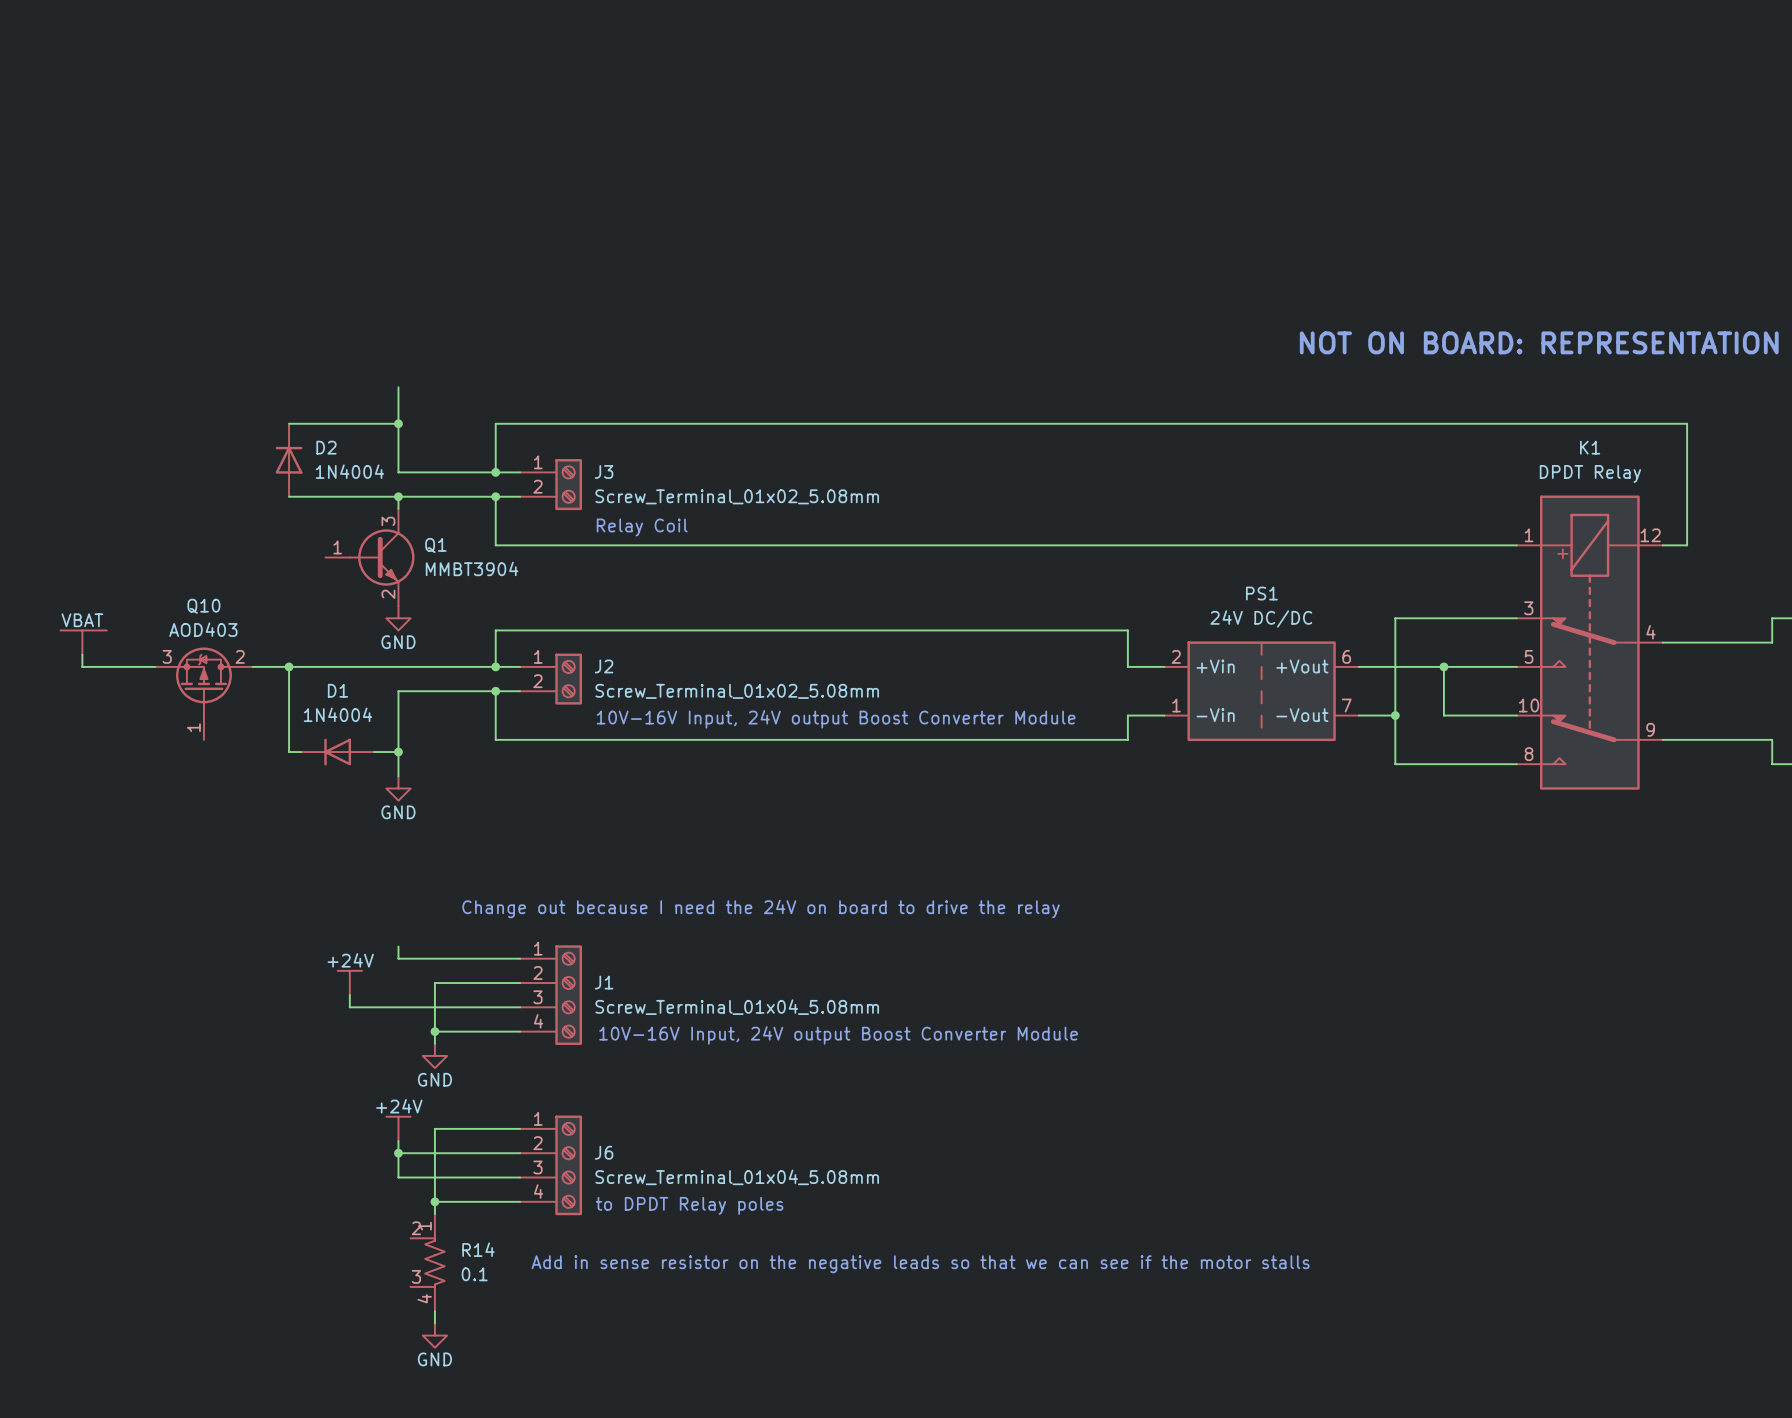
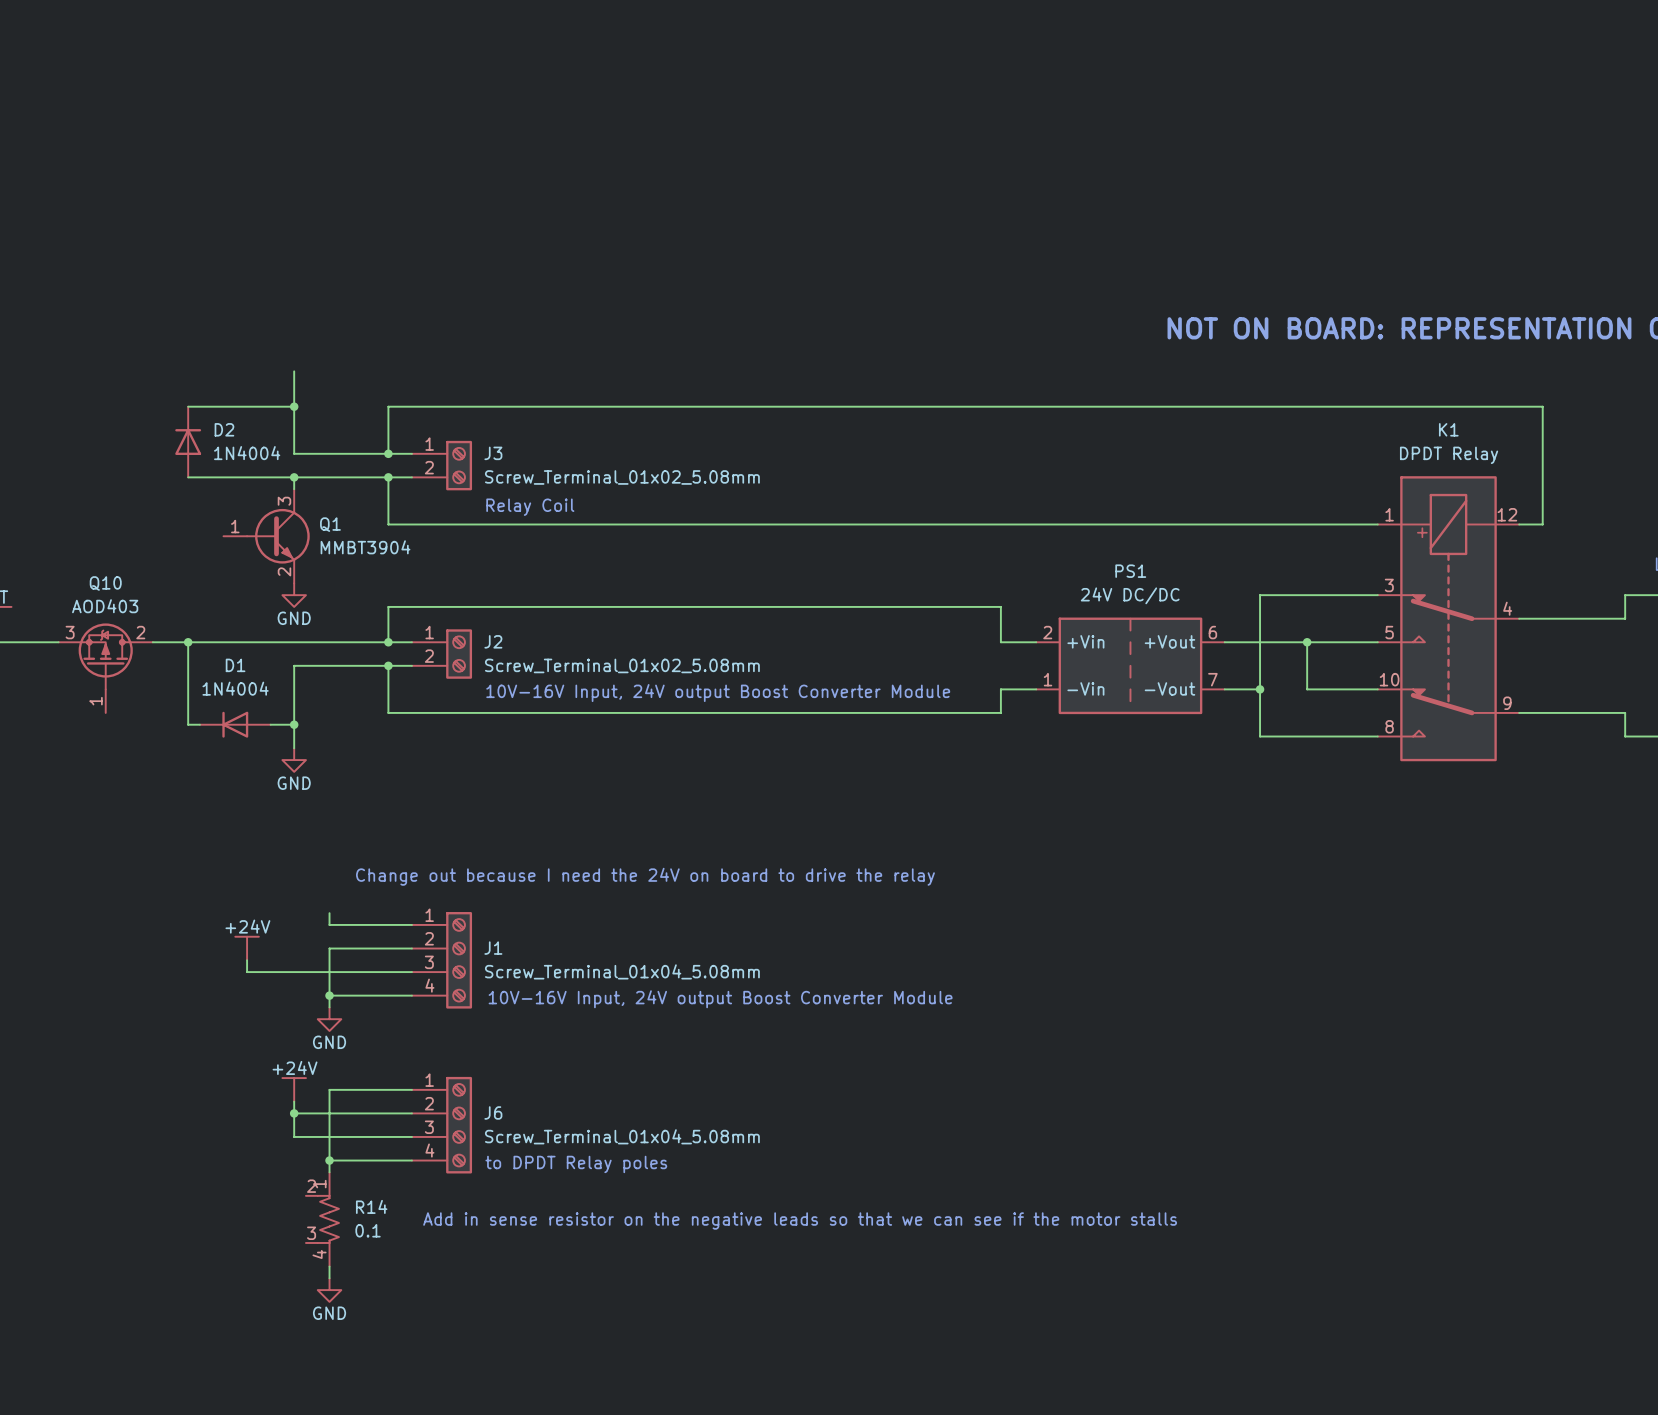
wire: (398, 946) (398, 958) (434, 958) -> (329, 913) (329, 924)

